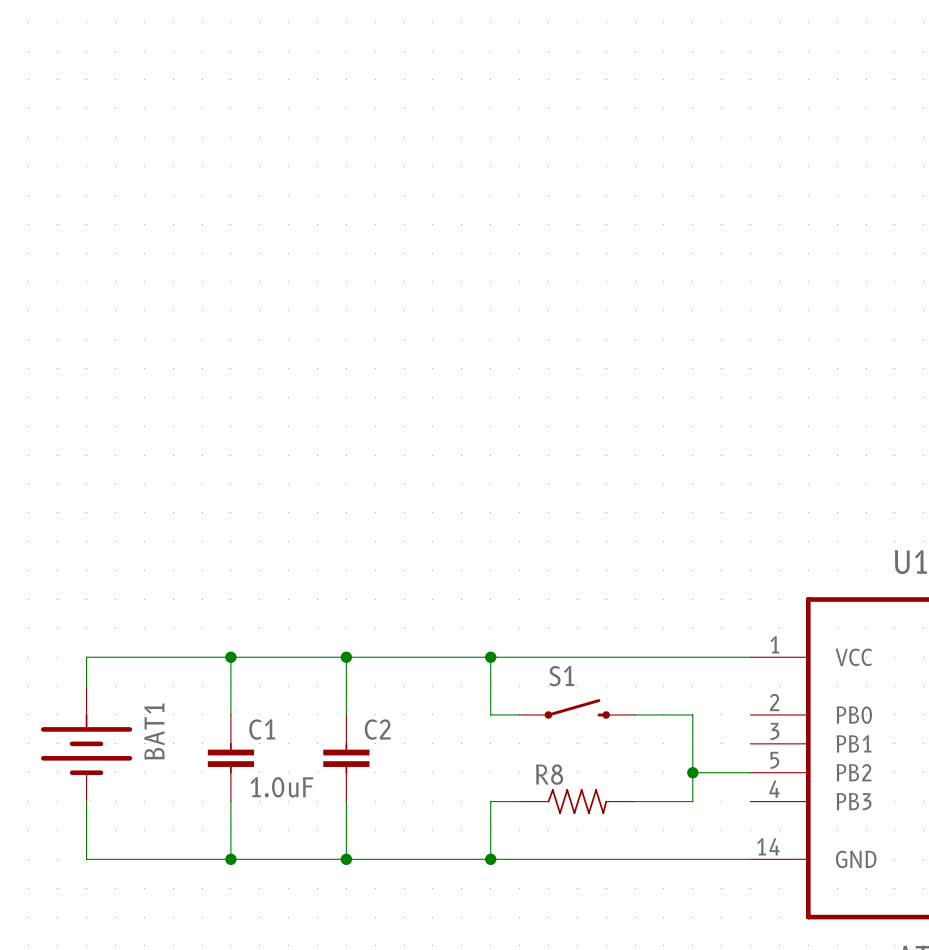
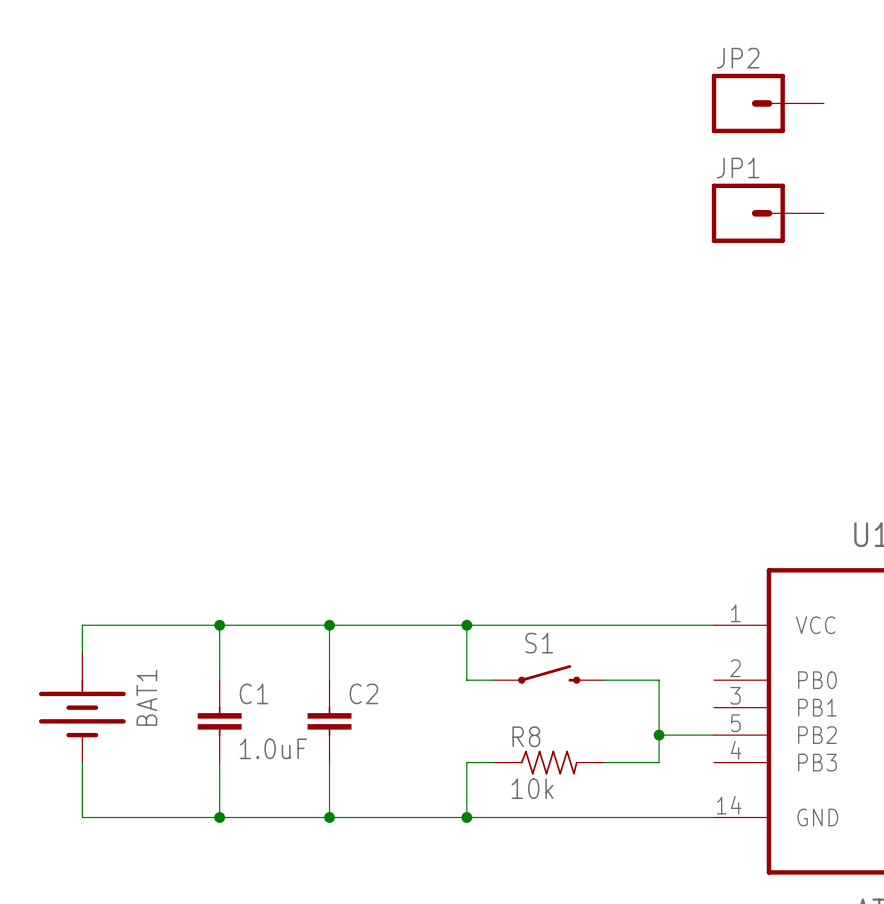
JP2: none -> (767, 103)
JP1: none -> (767, 213)
R8 value: none -> 10k (532, 788)

